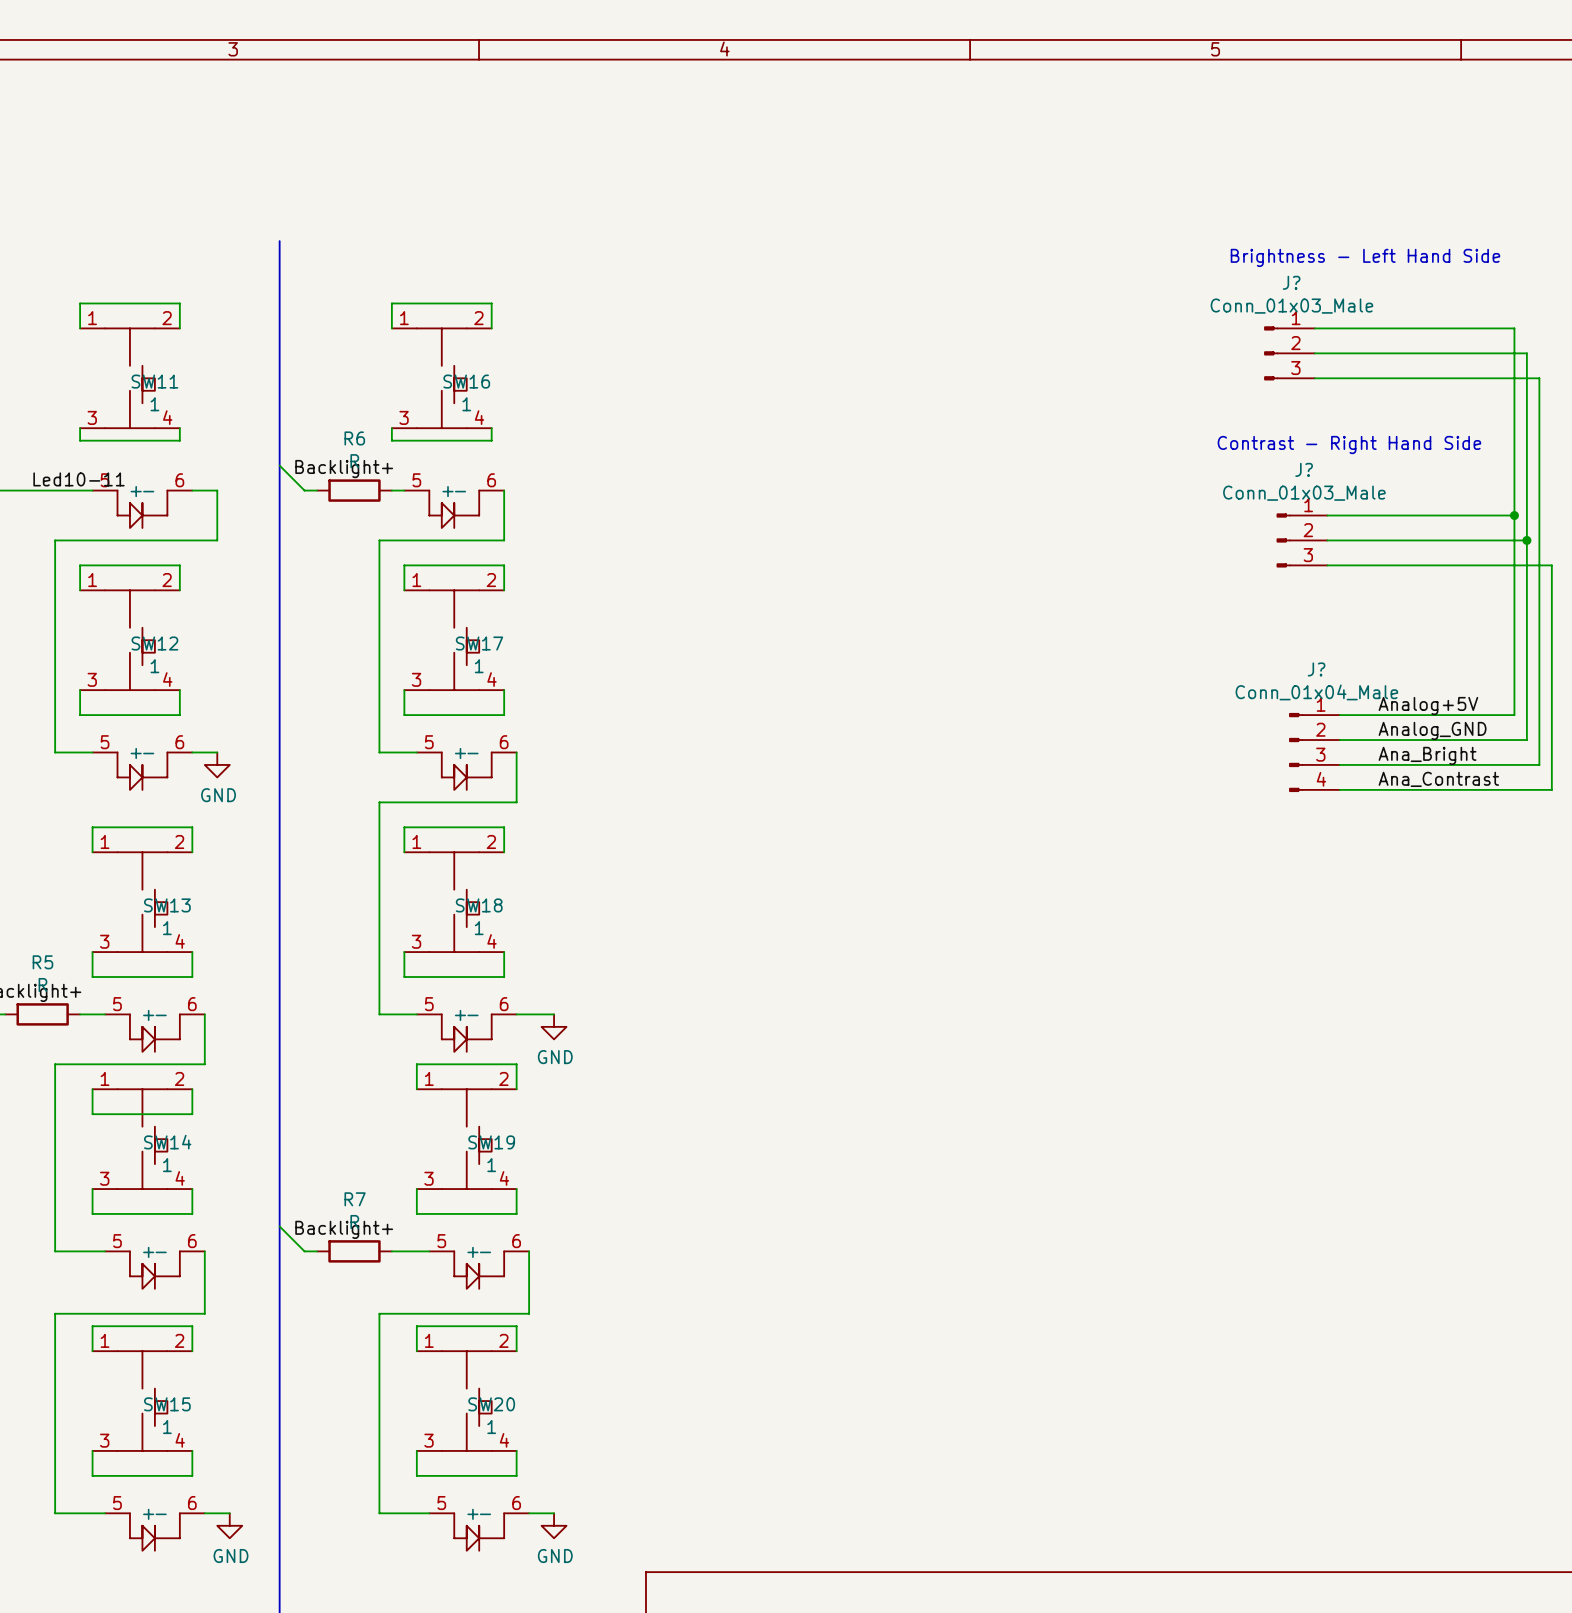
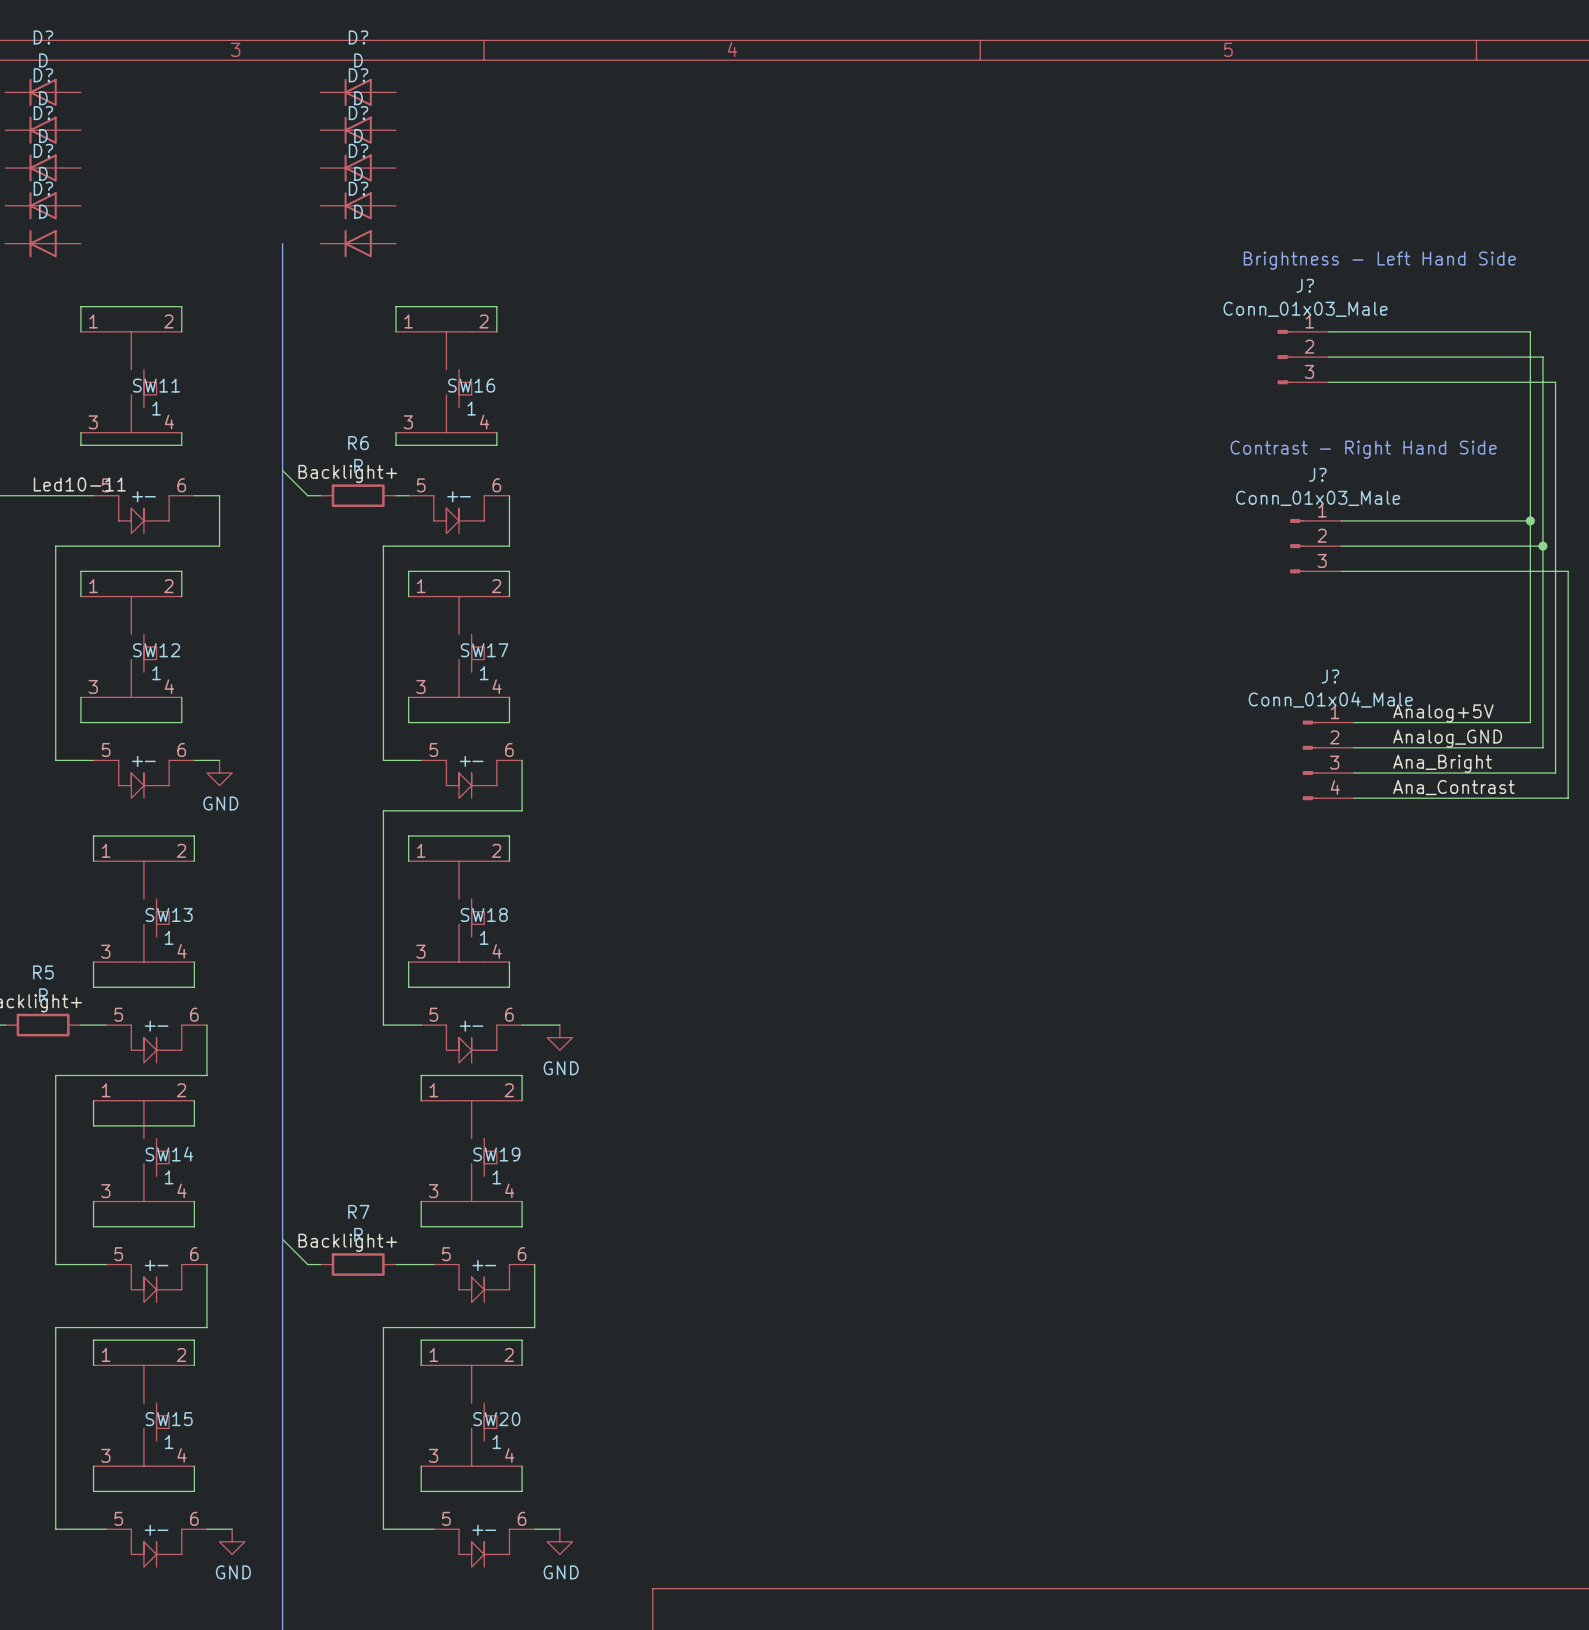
D?: none -> D (43, 92)
D?: none -> D (358, 92)
D?: none -> D (43, 130)
D?: none -> D (358, 130)
D?: none -> D (43, 168)
D?: none -> D (358, 168)
D?: none -> D (43, 205)
D?: none -> D (358, 205)
D?: none -> D (43, 243)
D?: none -> D (358, 243)

